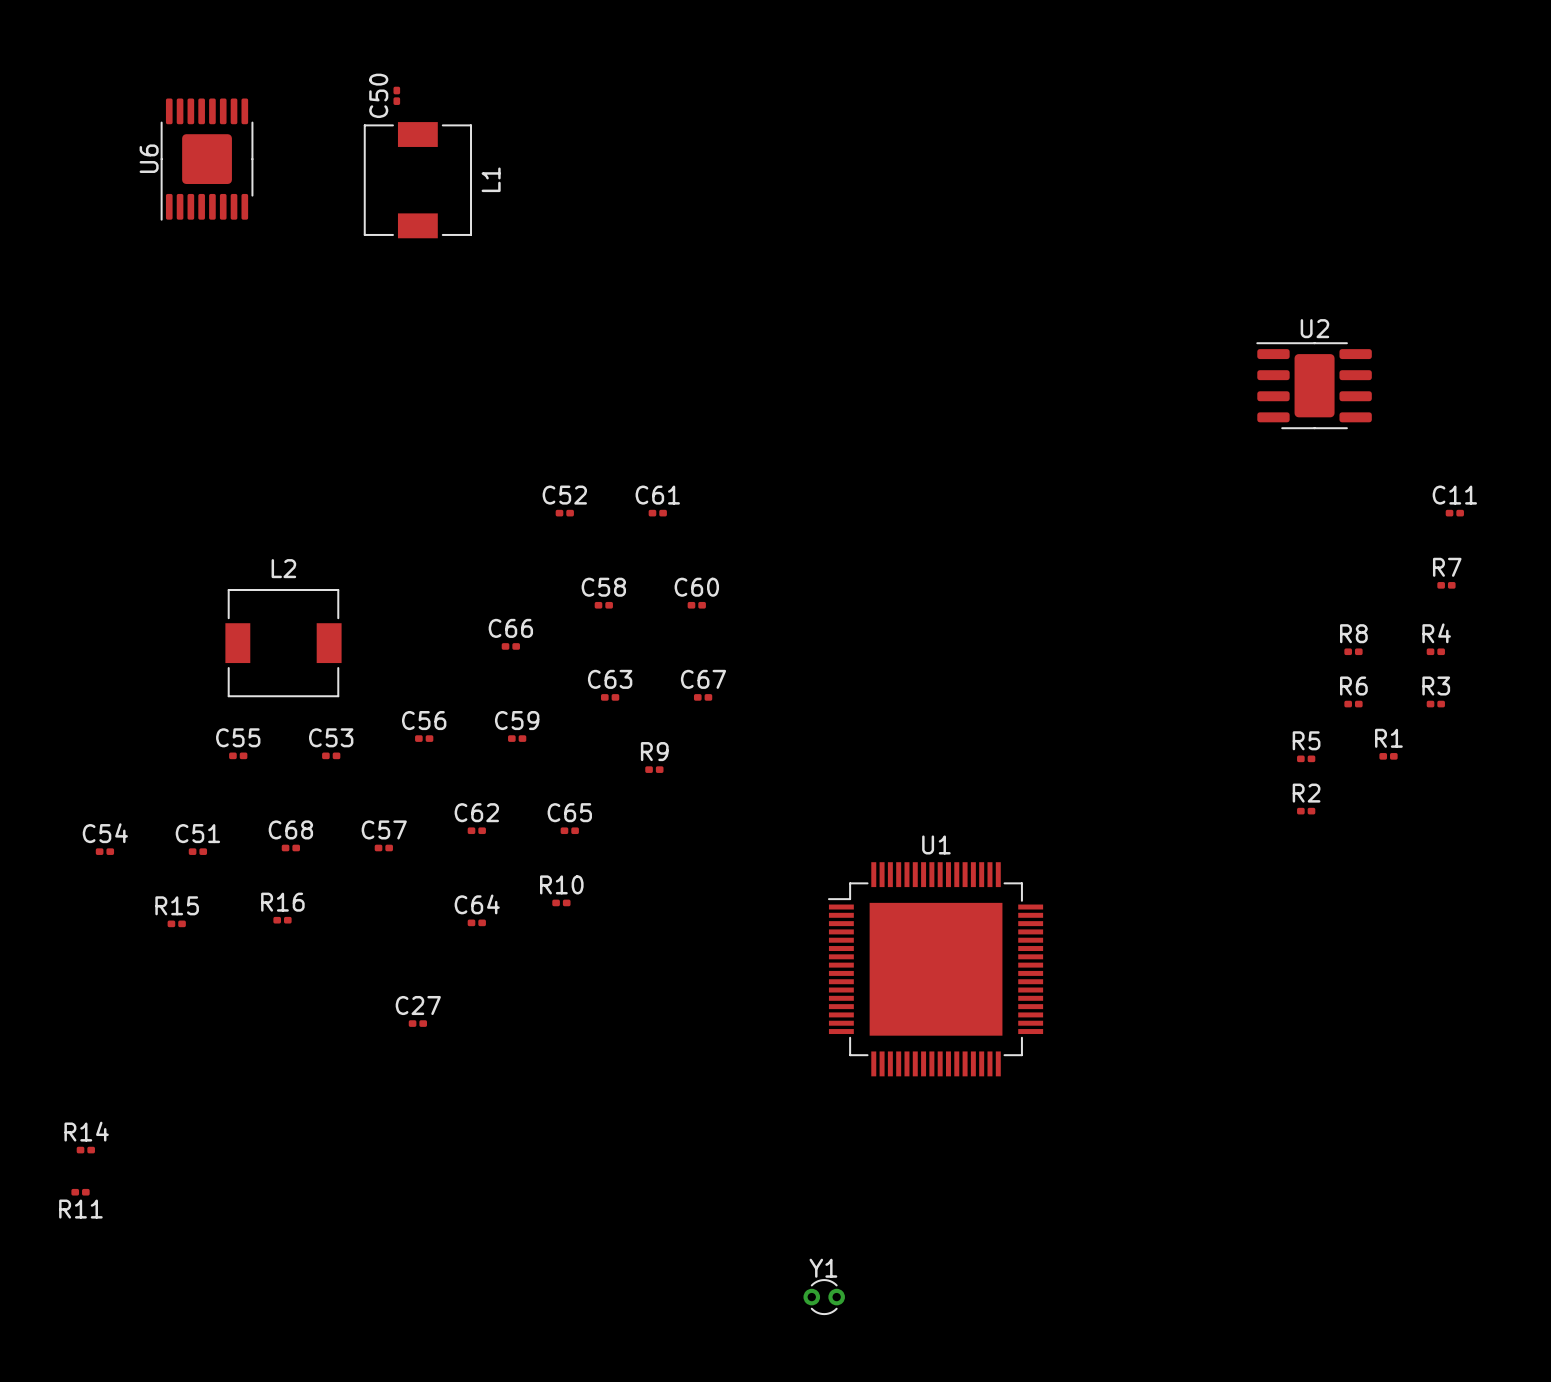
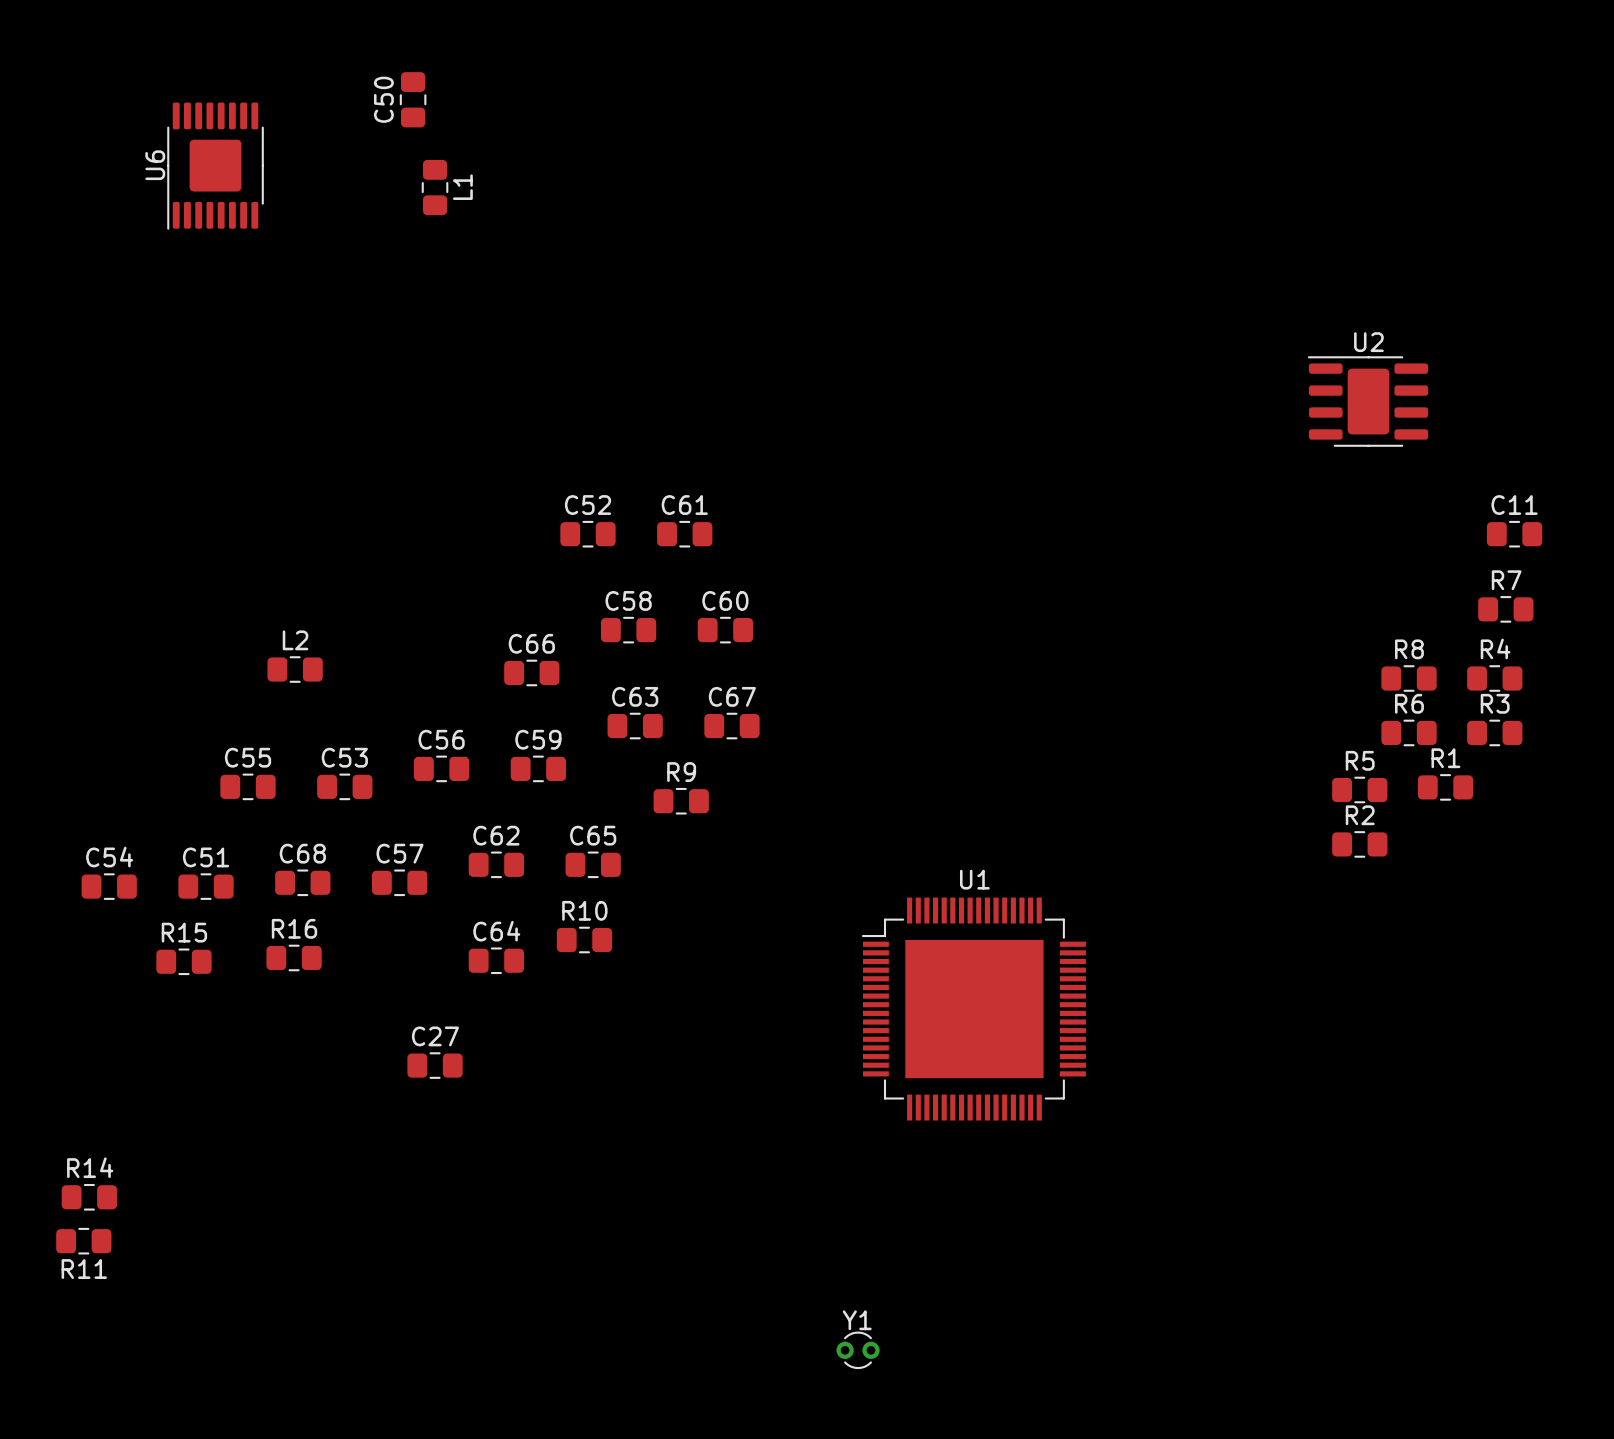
C50 footprint: [393, 86, 401, 105] -> [399, 72, 427, 128]
L1 footprint: [363, 122, 473, 239] -> [421, 159, 449, 216]
L1 name position: L1 (491, 179) -> L1 (462, 187)
C52 footprint: [555, 509, 574, 517] -> [560, 520, 616, 548]
C61 footprint: [648, 509, 667, 517] -> [657, 520, 713, 548]
C11 footprint: [1445, 509, 1464, 517] -> [1486, 520, 1543, 548]
L2 name position: L2 (283, 568) -> L2 (295, 640)
R7 footprint: [1437, 582, 1456, 589] -> [1478, 596, 1534, 623]
L2 footprint: [225, 589, 342, 698] -> [267, 656, 323, 683]
C58 footprint: [594, 601, 613, 609] -> [600, 616, 657, 644]
C60 footprint: [687, 601, 706, 609] -> [697, 616, 754, 644]
C66 footprint: [501, 643, 520, 650] -> [504, 659, 560, 687]
R8 footprint: [1344, 648, 1363, 656] -> [1381, 665, 1437, 692]
R4 footprint: [1426, 648, 1445, 656] -> [1467, 665, 1523, 692]
C63 footprint: [600, 694, 620, 701] -> [607, 712, 663, 740]
C67 footprint: [693, 694, 713, 701] -> [704, 712, 760, 740]
R6 footprint: [1344, 700, 1363, 708] -> [1381, 719, 1437, 747]
R3 footprint: [1426, 700, 1445, 708] -> [1467, 719, 1523, 747]
C56 footprint: [415, 735, 434, 742] -> [413, 755, 470, 783]
C59 footprint: [508, 735, 527, 742] -> [510, 755, 567, 783]
C55 footprint: [229, 752, 248, 760] -> [220, 773, 276, 801]
C53 footprint: [322, 752, 341, 760] -> [317, 773, 373, 801]
R1 footprint: [1379, 753, 1398, 760] -> [1417, 774, 1474, 801]
R5 footprint: [1297, 755, 1316, 763] -> [1332, 776, 1388, 804]
R9 footprint: [645, 766, 664, 773] -> [653, 787, 709, 815]
R2 footprint: [1297, 807, 1316, 815] -> [1332, 831, 1388, 858]
C62 footprint: [467, 827, 486, 835] -> [468, 851, 525, 879]
C65 footprint: [560, 827, 579, 835] -> [565, 851, 621, 879]
C68 footprint: [281, 844, 301, 852] -> [275, 869, 331, 897]
C57 footprint: [374, 844, 393, 852] -> [371, 869, 428, 897]
C54 footprint: [95, 848, 115, 855] -> [81, 873, 137, 900]
C51 footprint: [188, 848, 208, 855] -> [178, 873, 234, 900]
R10 footprint: [552, 899, 571, 907] -> [556, 926, 613, 954]
R16 footprint: [273, 916, 292, 924] -> [266, 944, 322, 972]
C64 footprint: [467, 919, 486, 927] -> [468, 947, 525, 975]
R15 footprint: [167, 920, 186, 928] -> [156, 948, 212, 976]
C27 footprint: [408, 1020, 428, 1027] -> [407, 1052, 463, 1079]
R14 footprint: [76, 1146, 95, 1154] -> [61, 1183, 118, 1211]
R11 footprint: [71, 1188, 90, 1196] -> [56, 1227, 112, 1255]

